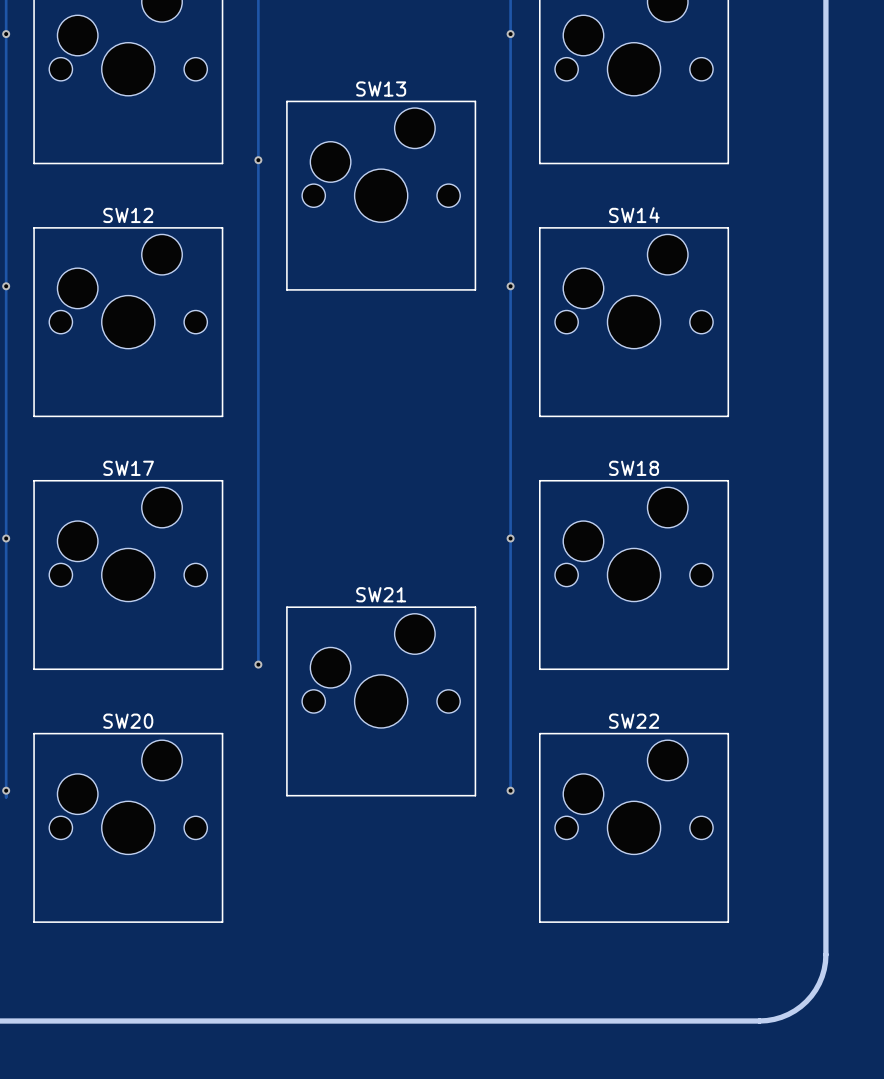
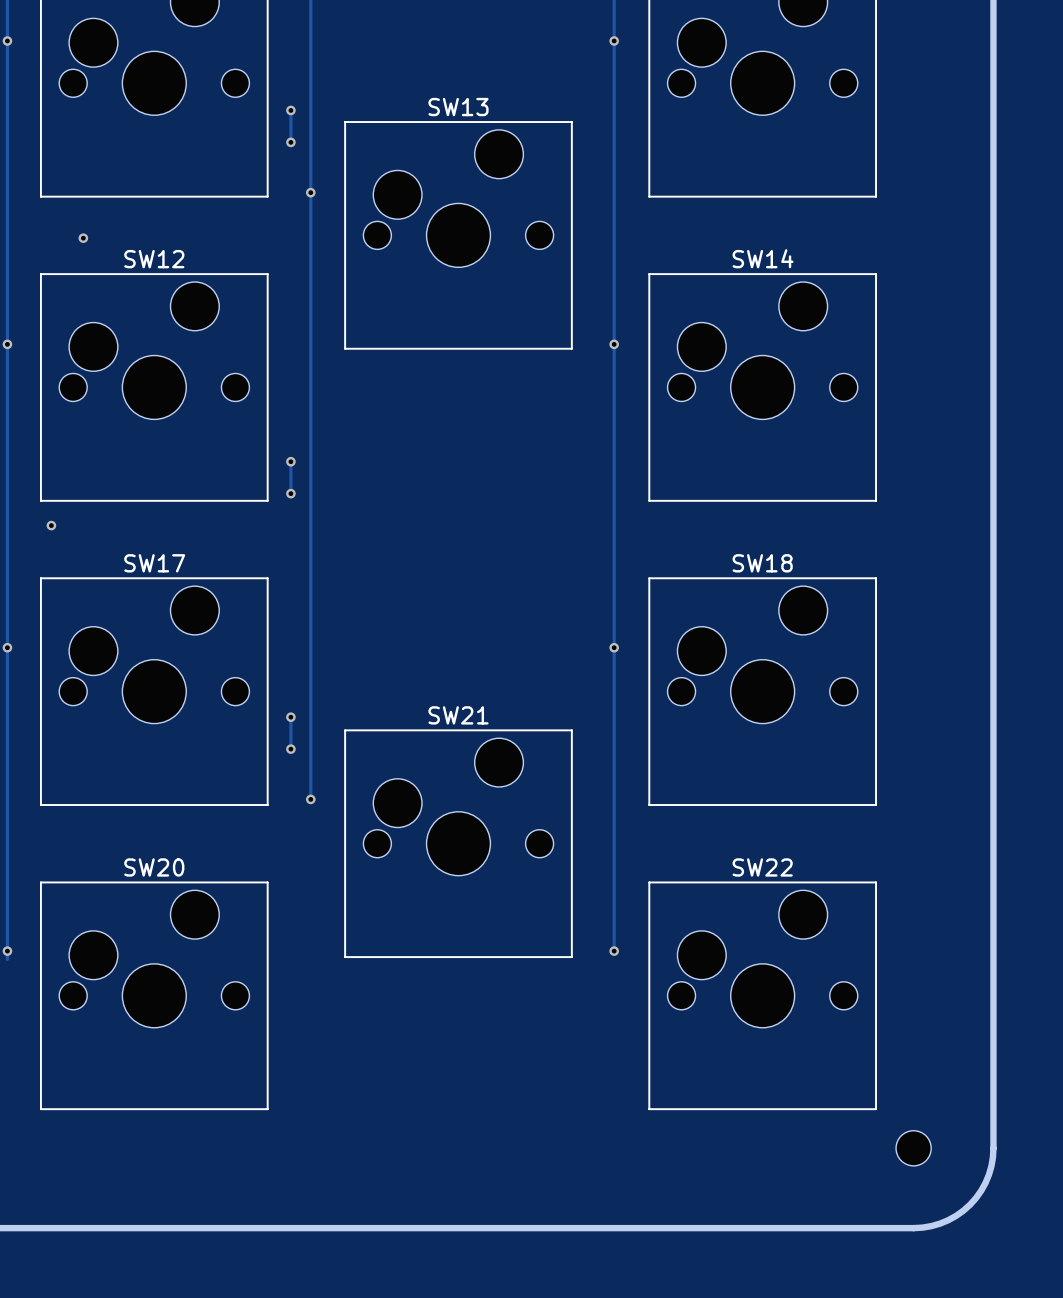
track: none -> (290, 110) (290, 142)
via: none -> (290, 110)
via: none -> (290, 142)
via: none -> (83, 238)
track: none -> (290, 461) (290, 493)
via: none -> (290, 461)
via: none -> (290, 493)
via: none -> (51, 525)
track: none -> (290, 717) (290, 749)
via: none -> (290, 717)
via: none -> (290, 749)
part: none -> (913, 1148)

